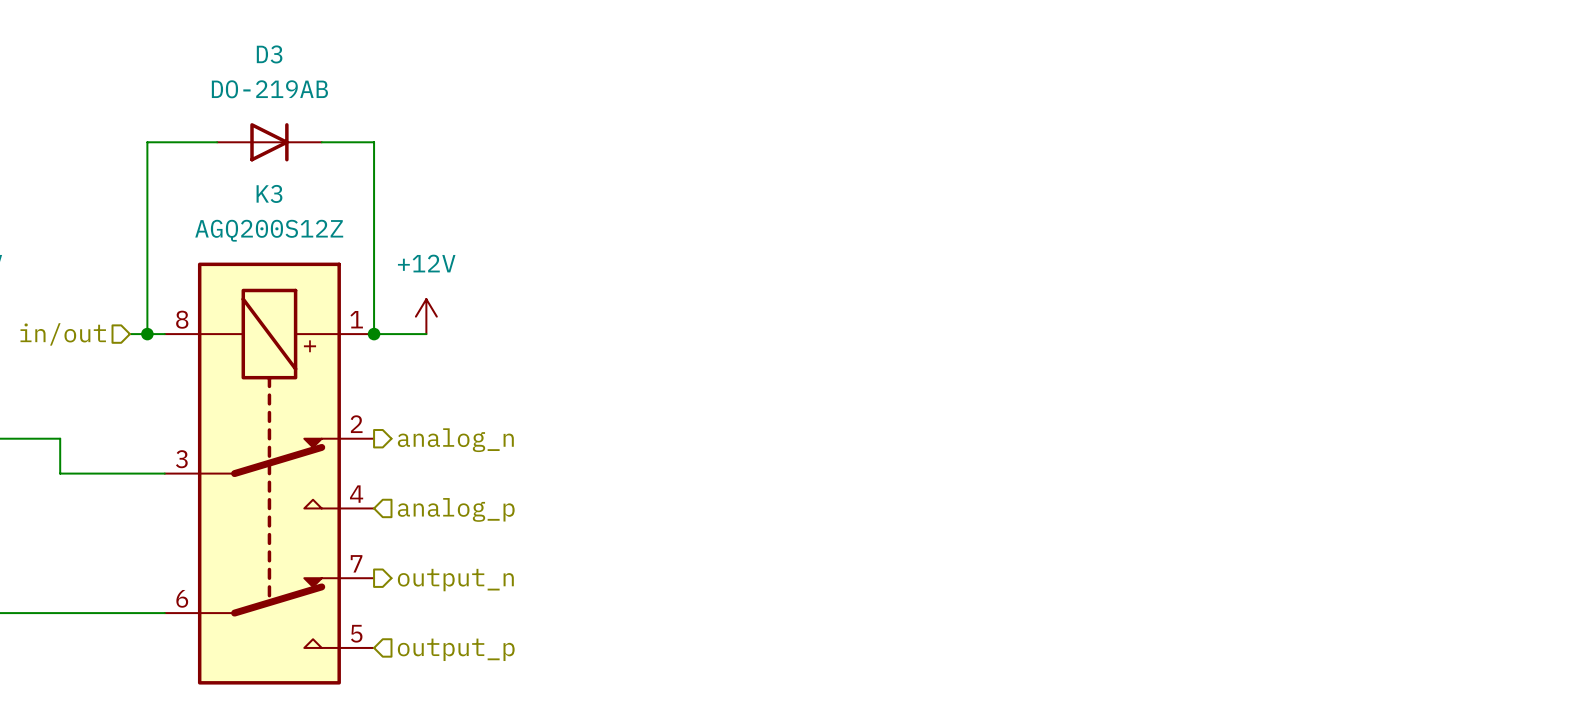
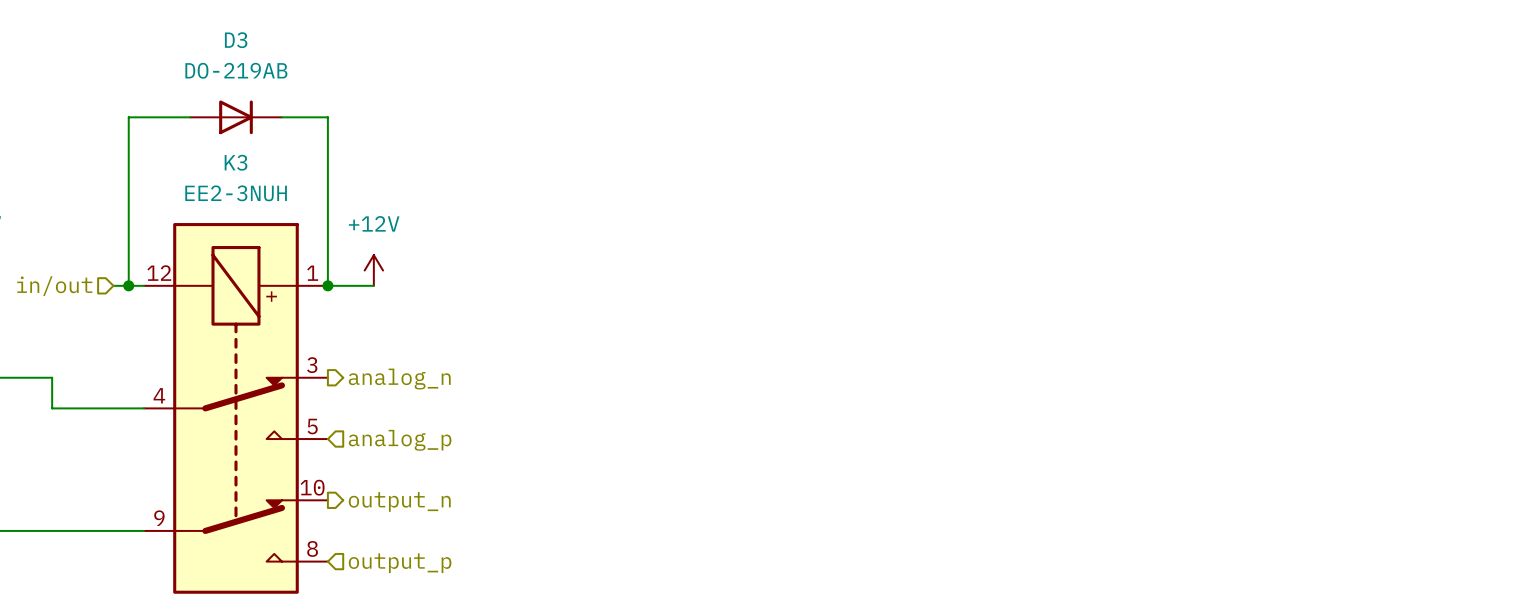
K3 value: AGQ200S12Z (269, 230) -> EE2-3NUH (236, 193)
K3 pin number: 8 (182, 319) -> 12 (159, 273)
K3 pin number: 2 (356, 424) -> 3 (312, 365)
K3 pin number: 3 (181, 459) -> 4 (159, 395)
K3 pin number: 4 (356, 494) -> 5 (312, 426)
K3 pin number: 7 (356, 563) -> 10 (312, 487)
K3 pin number: 6 (182, 598) -> 9 (159, 518)
K3 pin number: 5 (356, 633) -> 8 (312, 548)

